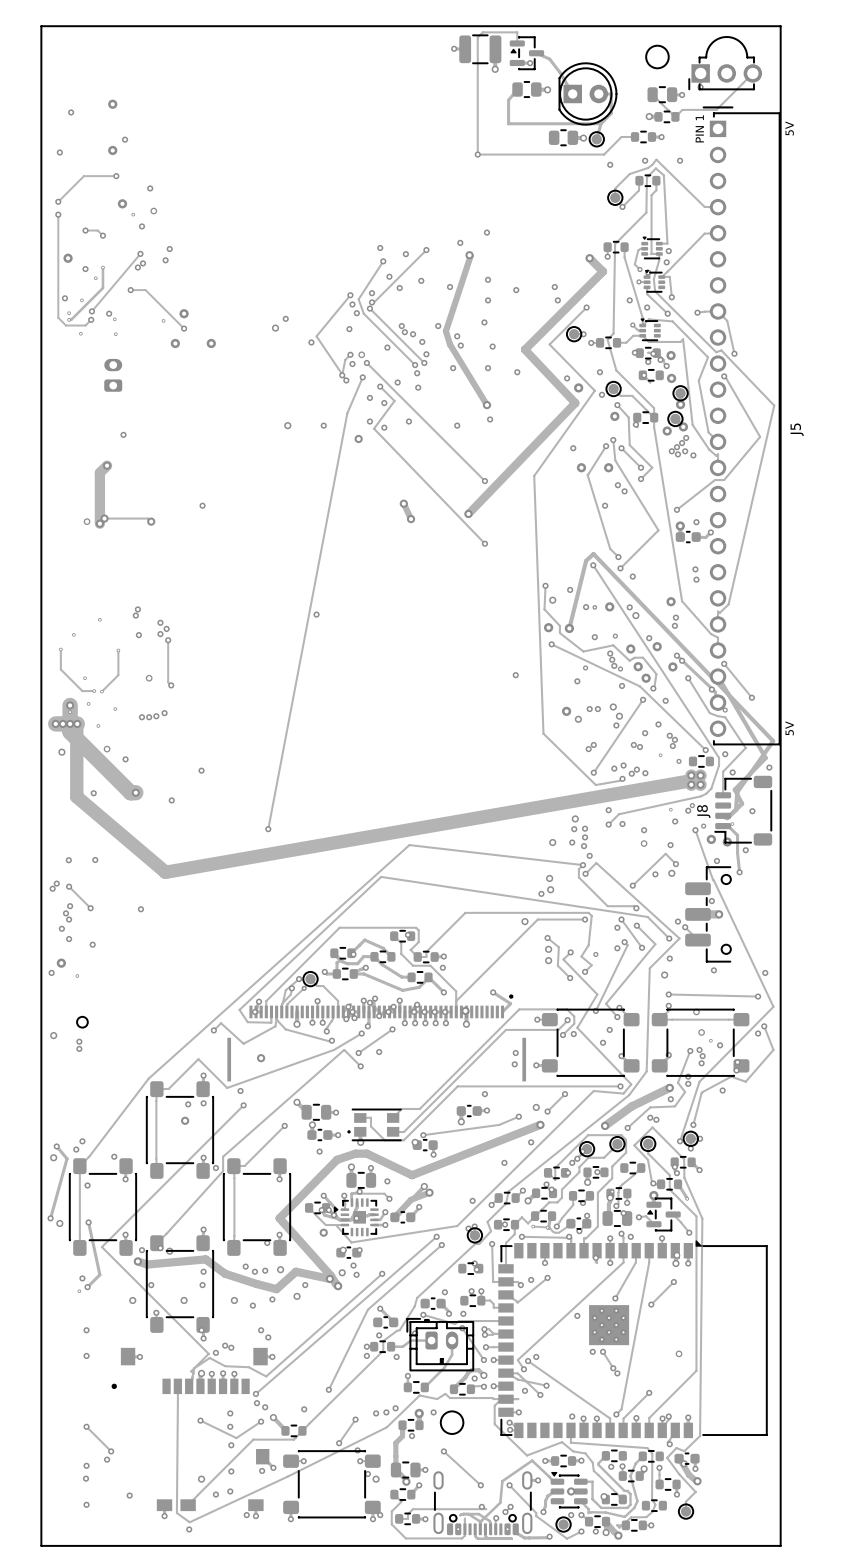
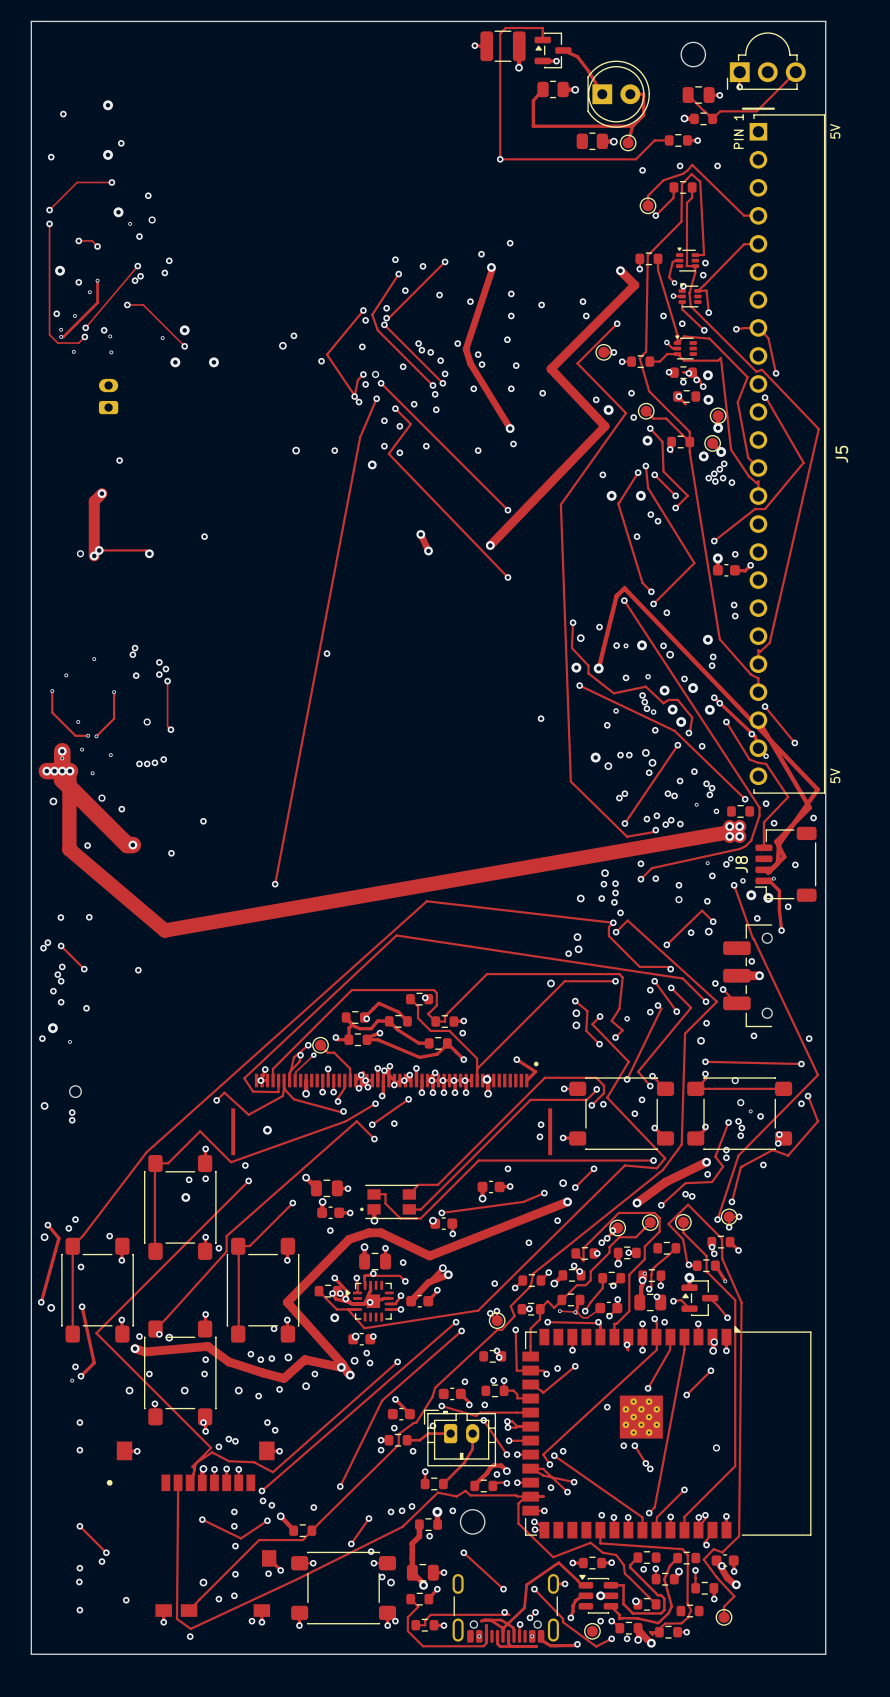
via: (399, 288) -> none
via: (356, 313) -> none

